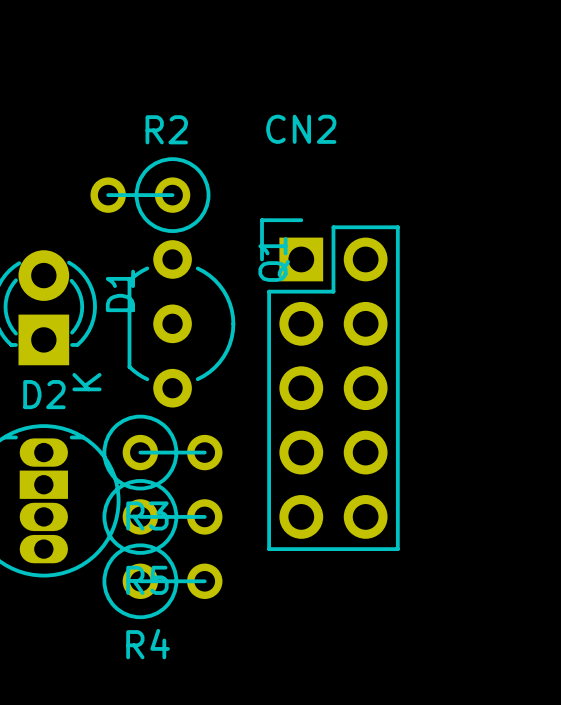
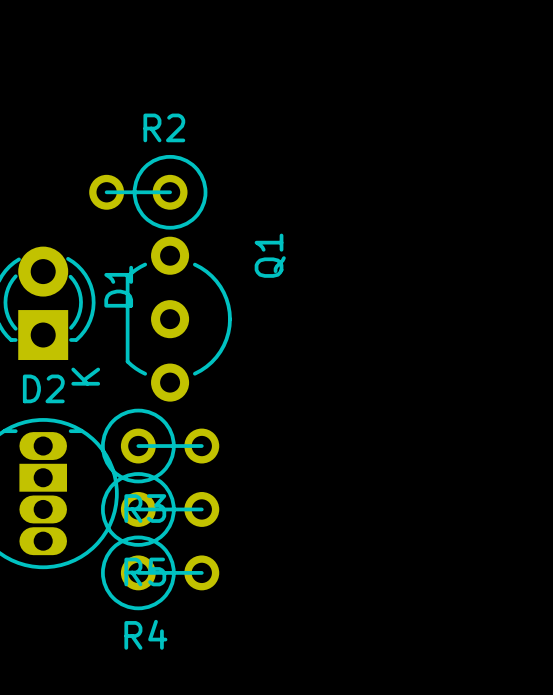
CN2: (329, 384) -> none

